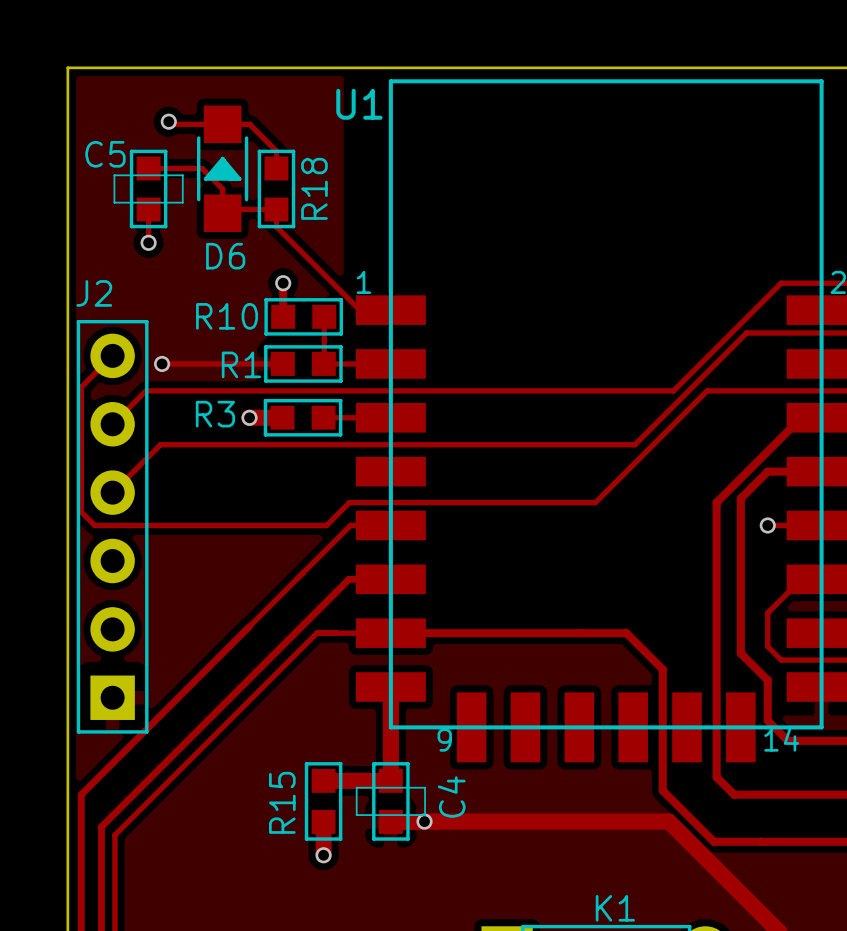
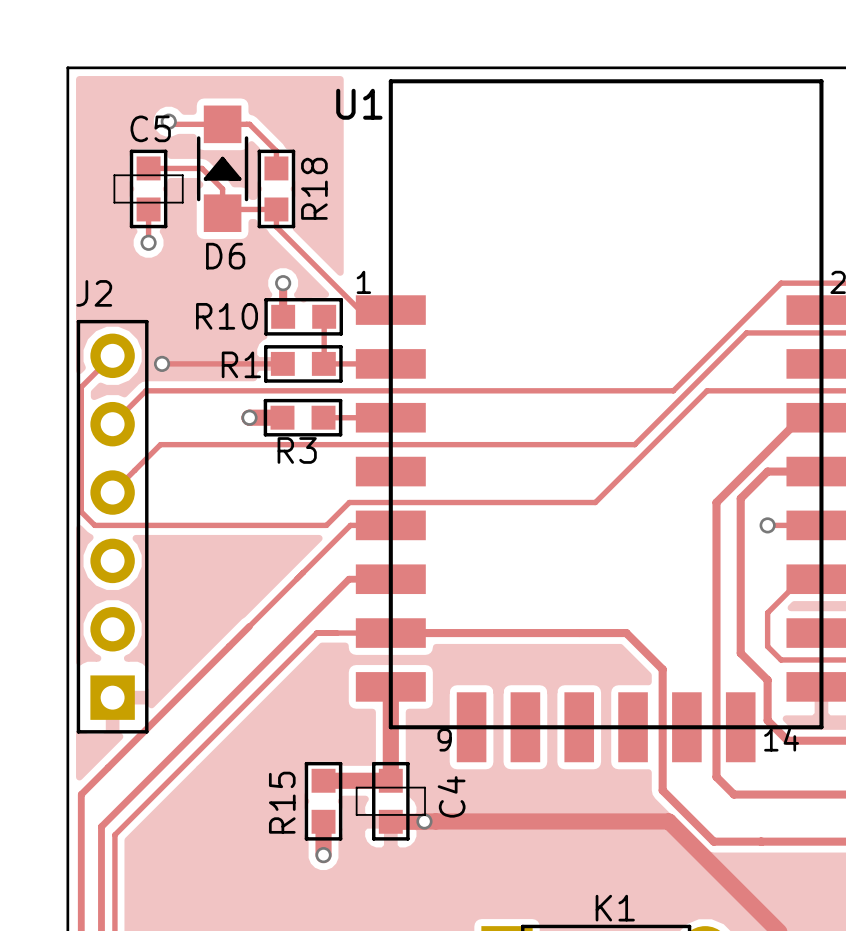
C5 name position: C5 (105, 154) -> C5 (150, 128)
R3 name position: R3 (215, 414) -> R3 (297, 450)

